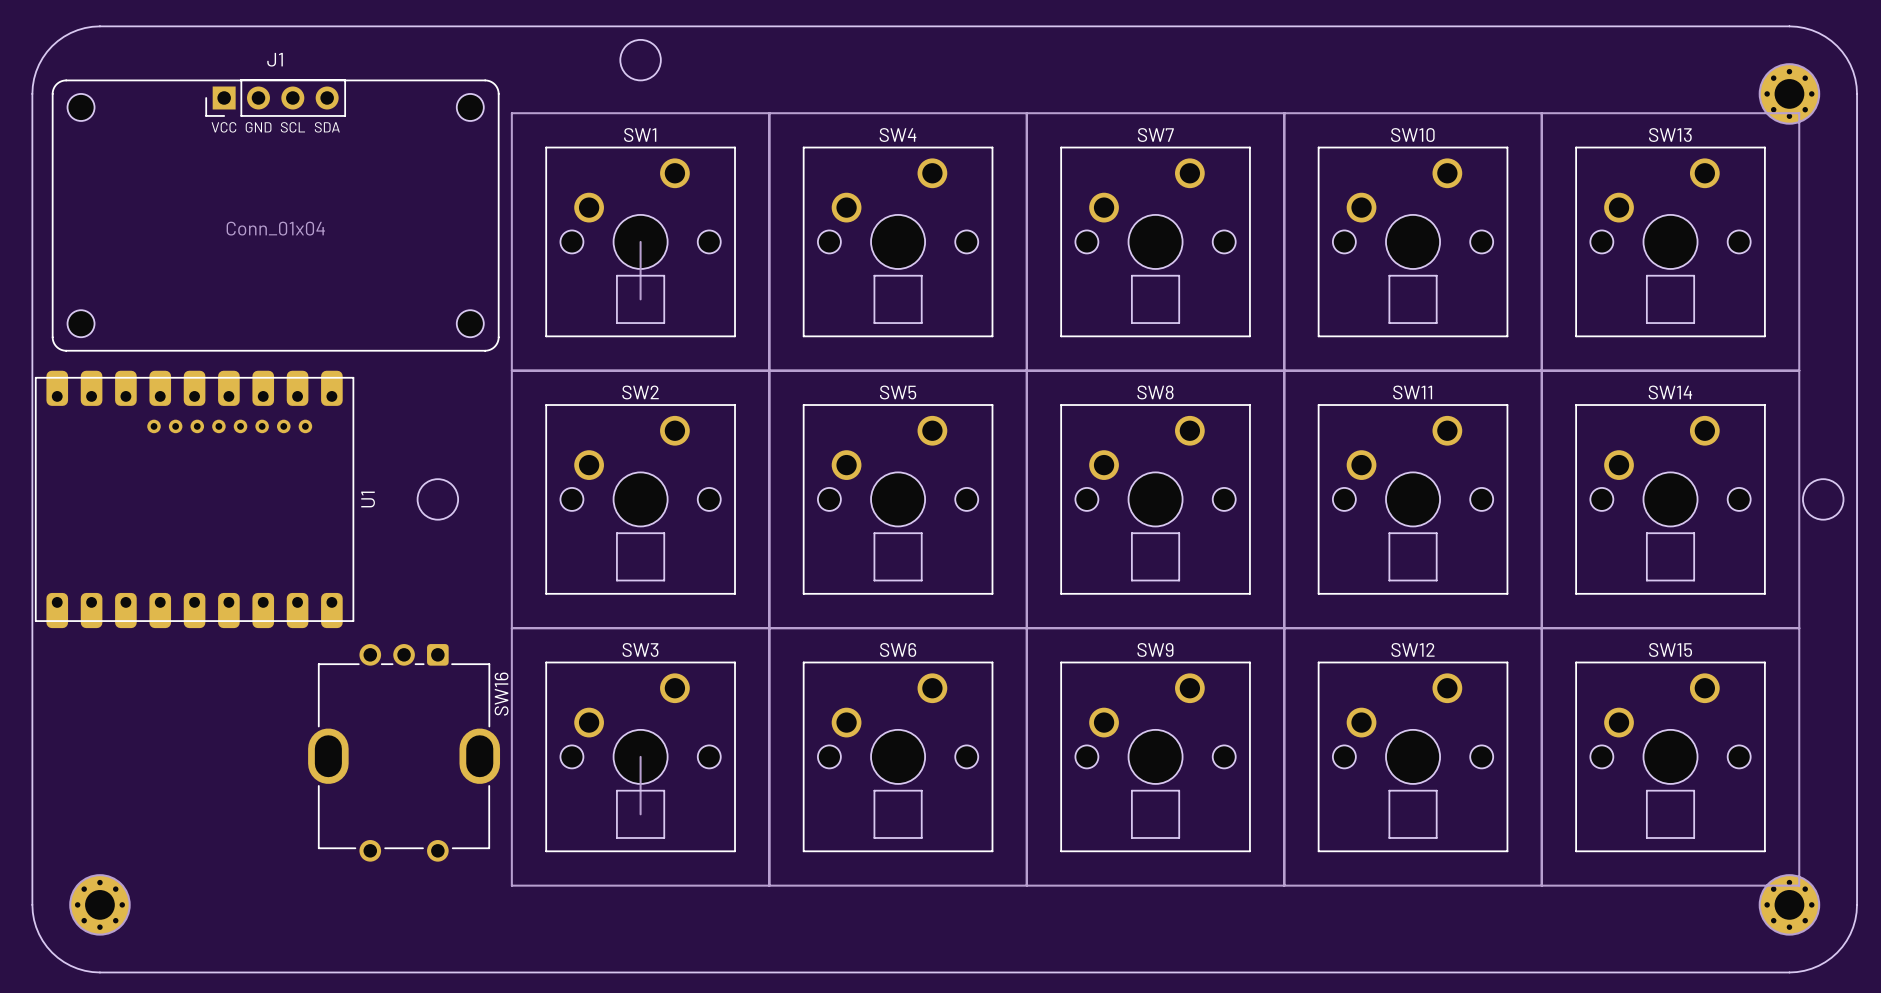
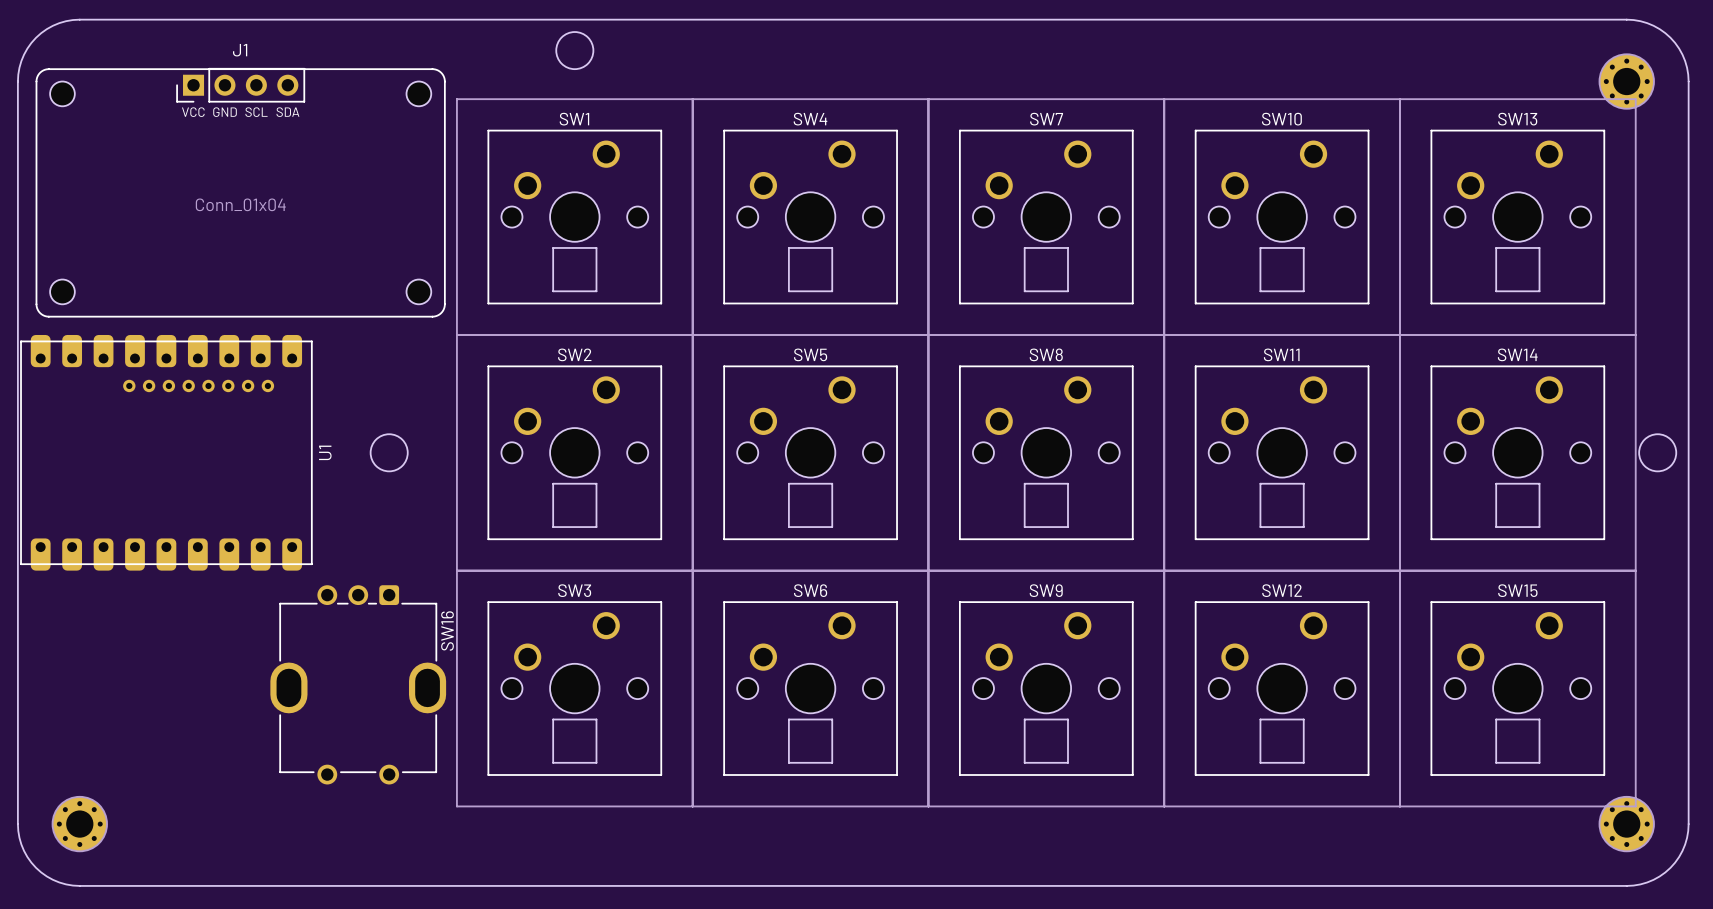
line: (640, 241) (640, 299) -> none
line: (640, 756) (640, 814) -> none

